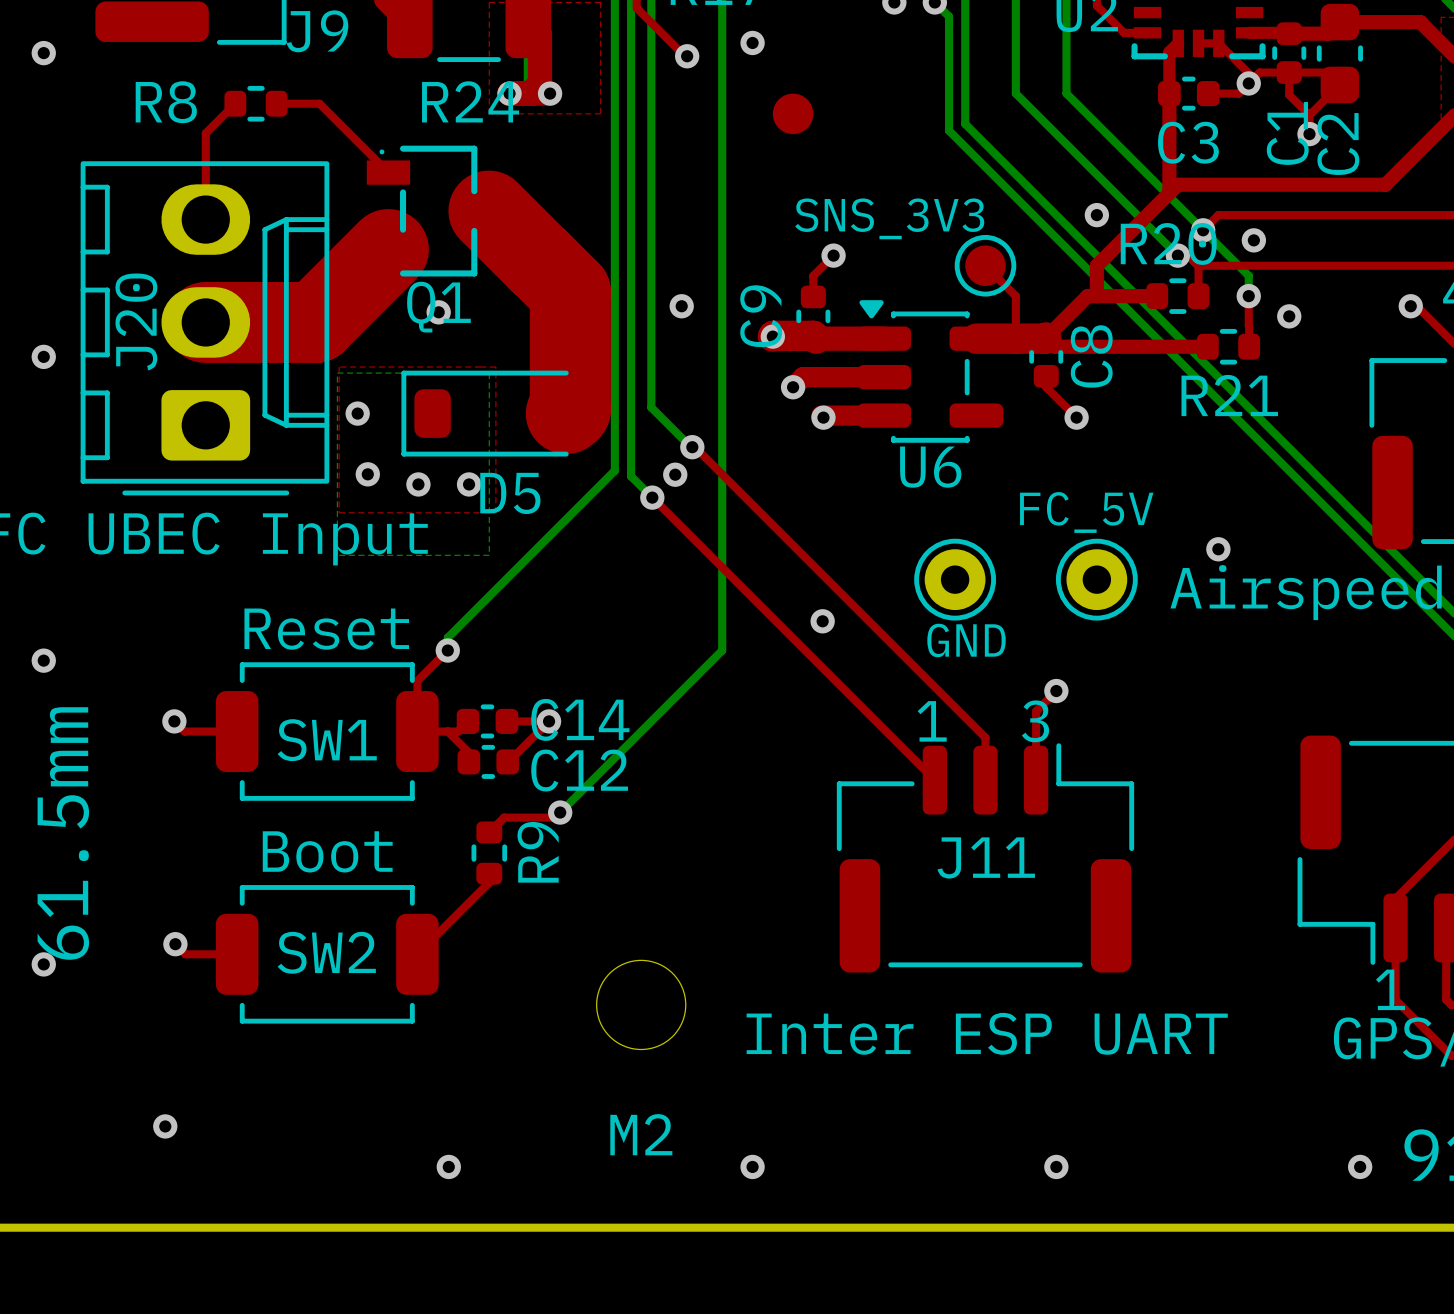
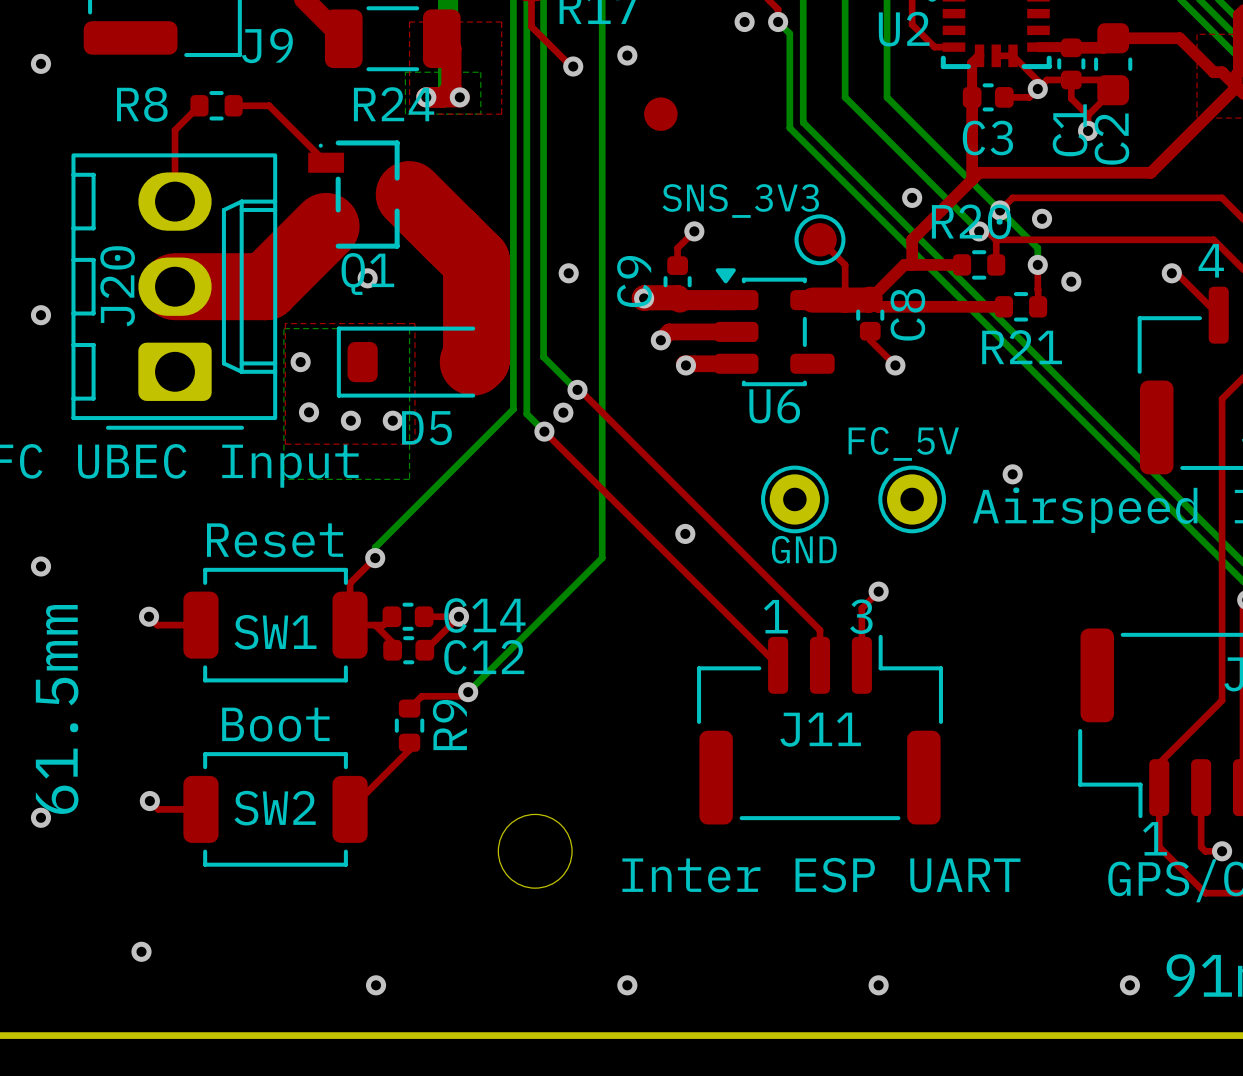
bottom zone outline: none -> (405, 72) (405, 114) (480, 114) (480, 72) (405, 72)
M2 name: M2 (641, 1134) -> none

